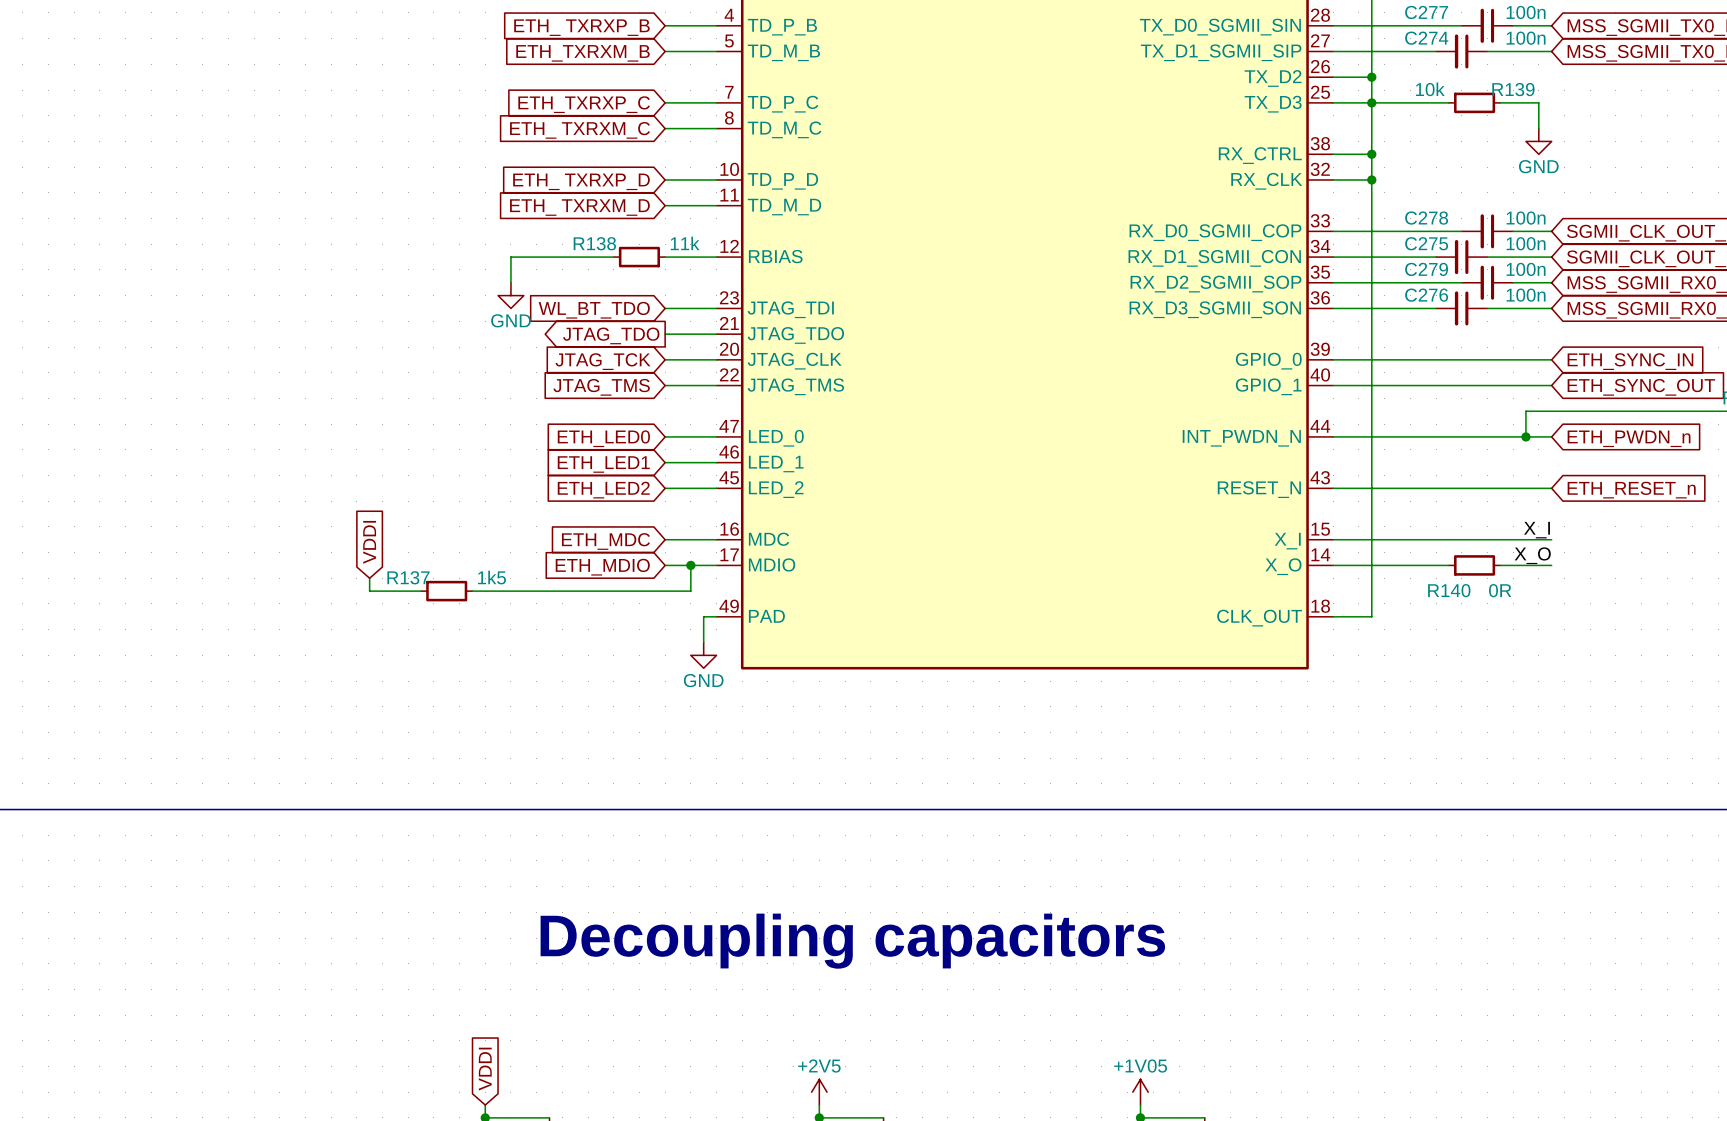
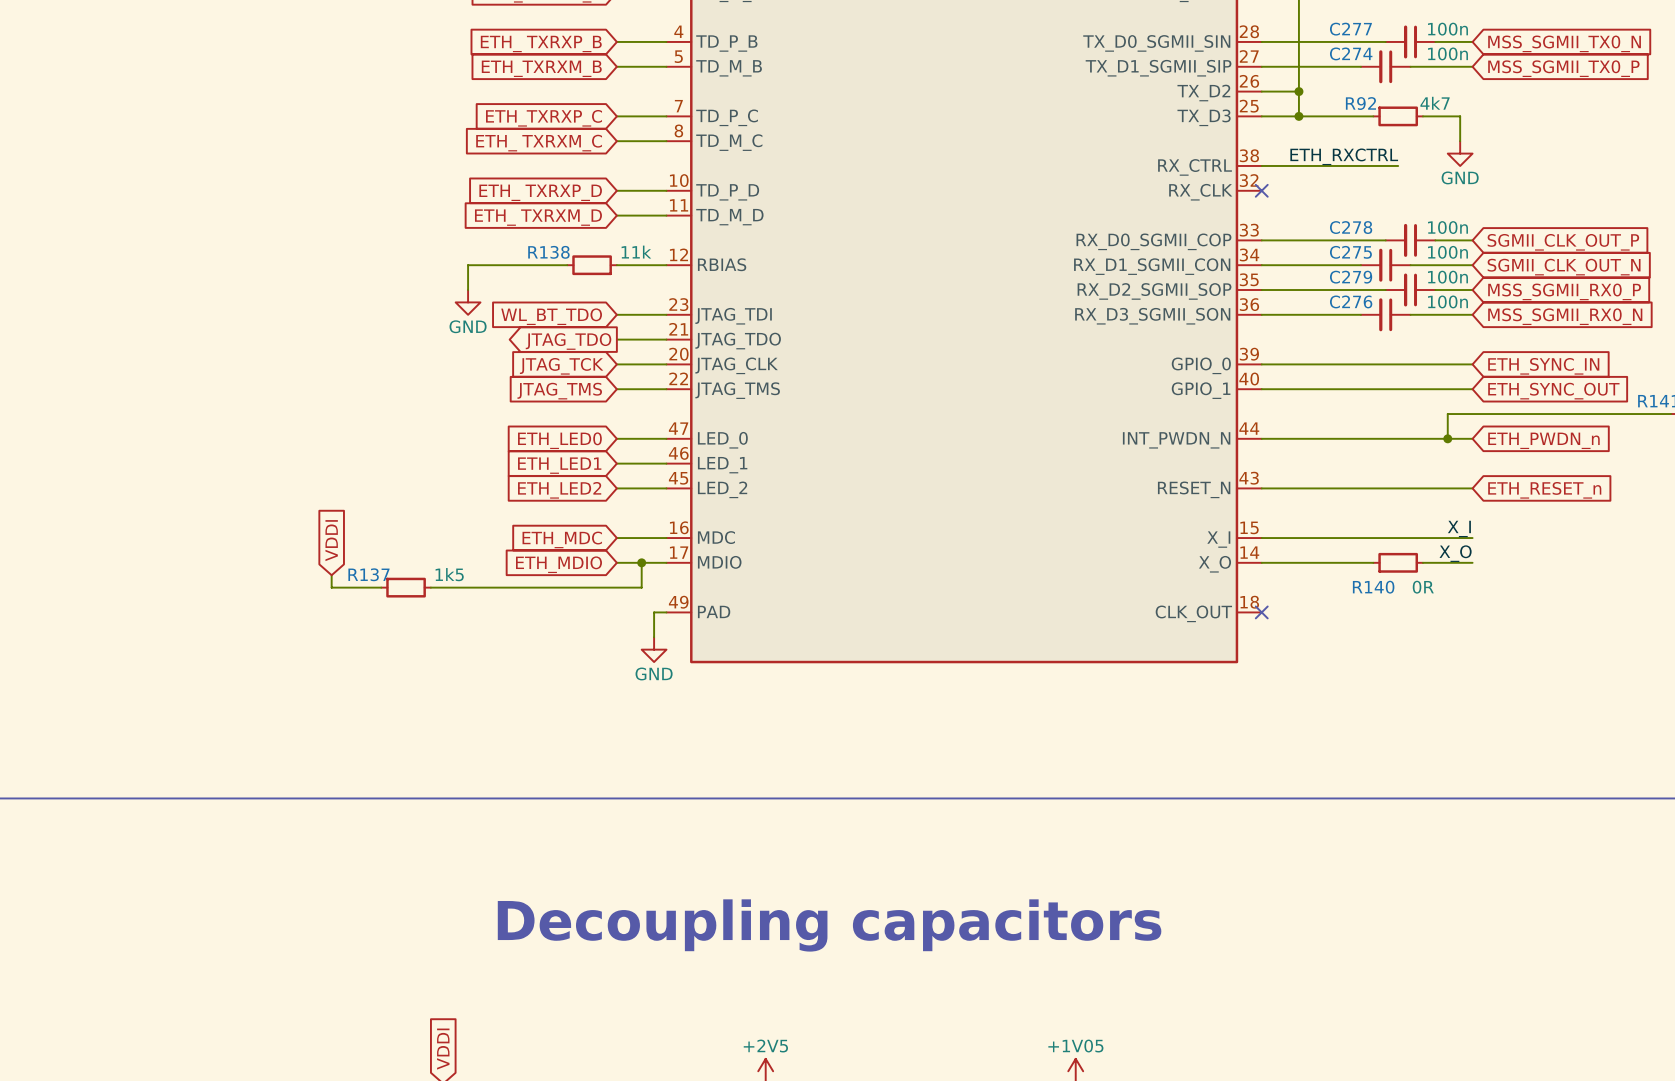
R139 text: 10k (1430, 89) -> 4k7 (1435, 103)
R139 name: R139 (1513, 89) -> R92 (1360, 103)
wire: (1371, 102) (1371, 616) (1333, 616) -> none
label: none -> ETH_RXCTRL (1344, 156)
wire: none -> (1298, 165) (1398, 165)
junction: (1371, 154) -> none
wire: (1333, 179) (1371, 179) -> none
no-connect mark: none -> (1261, 190)
junction: (1371, 179) -> none
no-connect mark: none -> (1261, 612)

